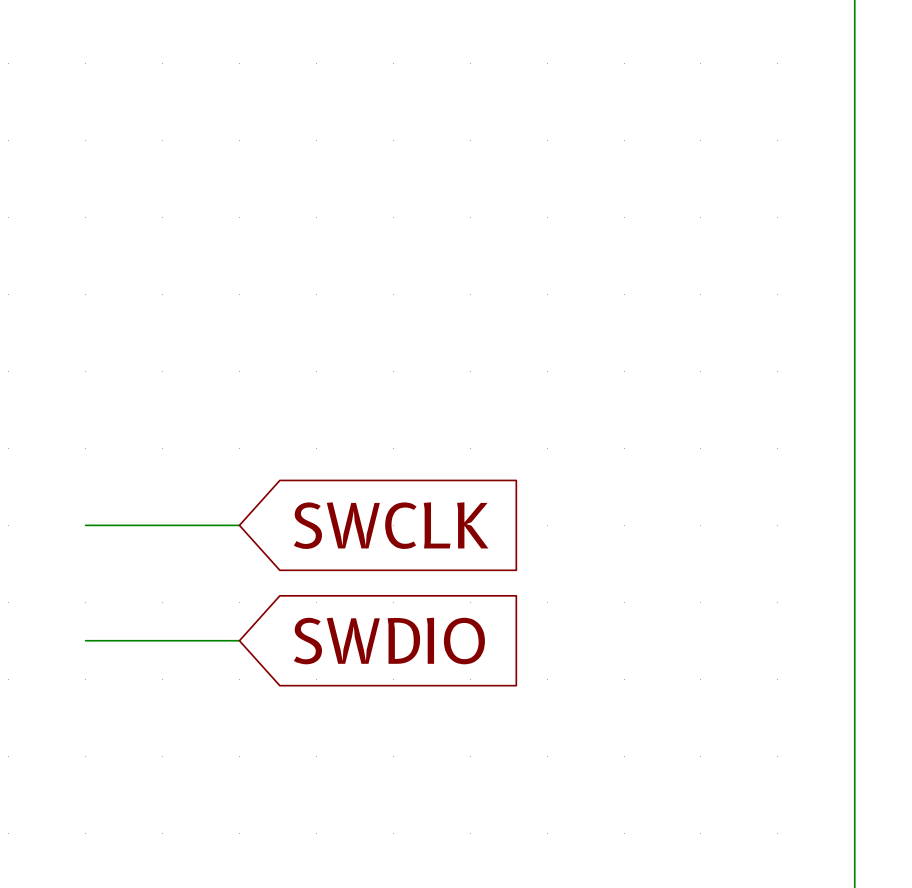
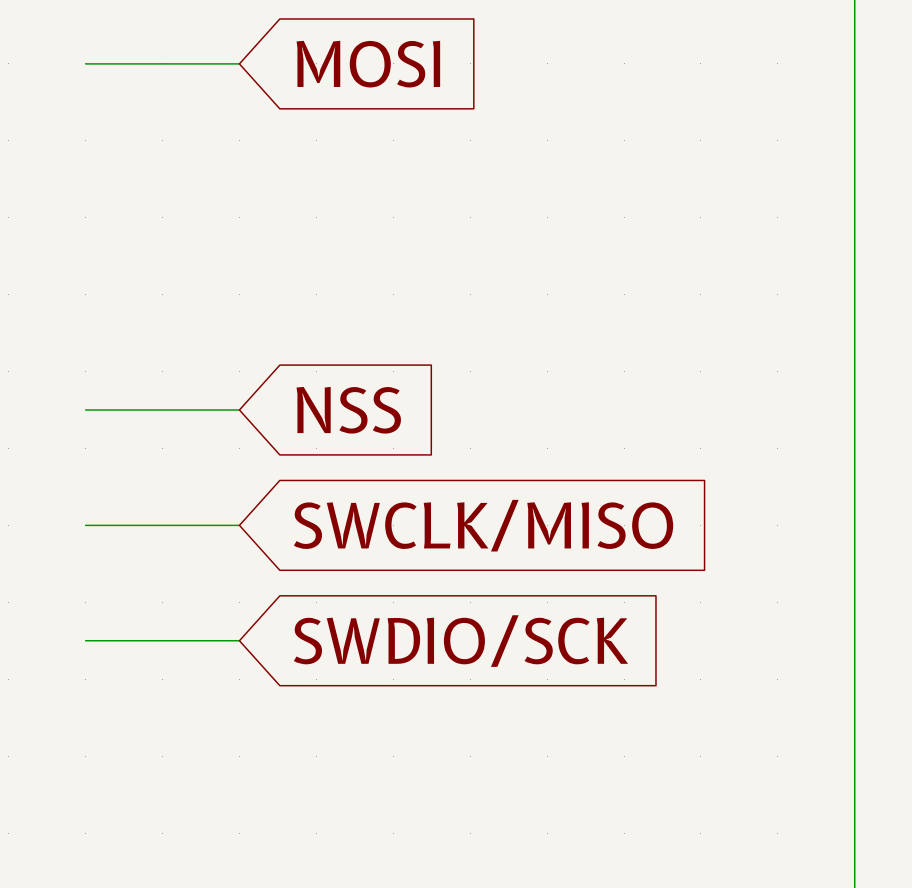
wire: none -> (85, 63) (239, 63)
global label: none -> MOSI (368, 64)
wire: none -> (85, 410) (239, 410)
global label: none -> NSS (348, 410)
global label: SWCLK (391, 525) -> SWCLK/MISO (483, 525)
global label: SWDIO (389, 641) -> SWDIO/SCK (460, 641)

